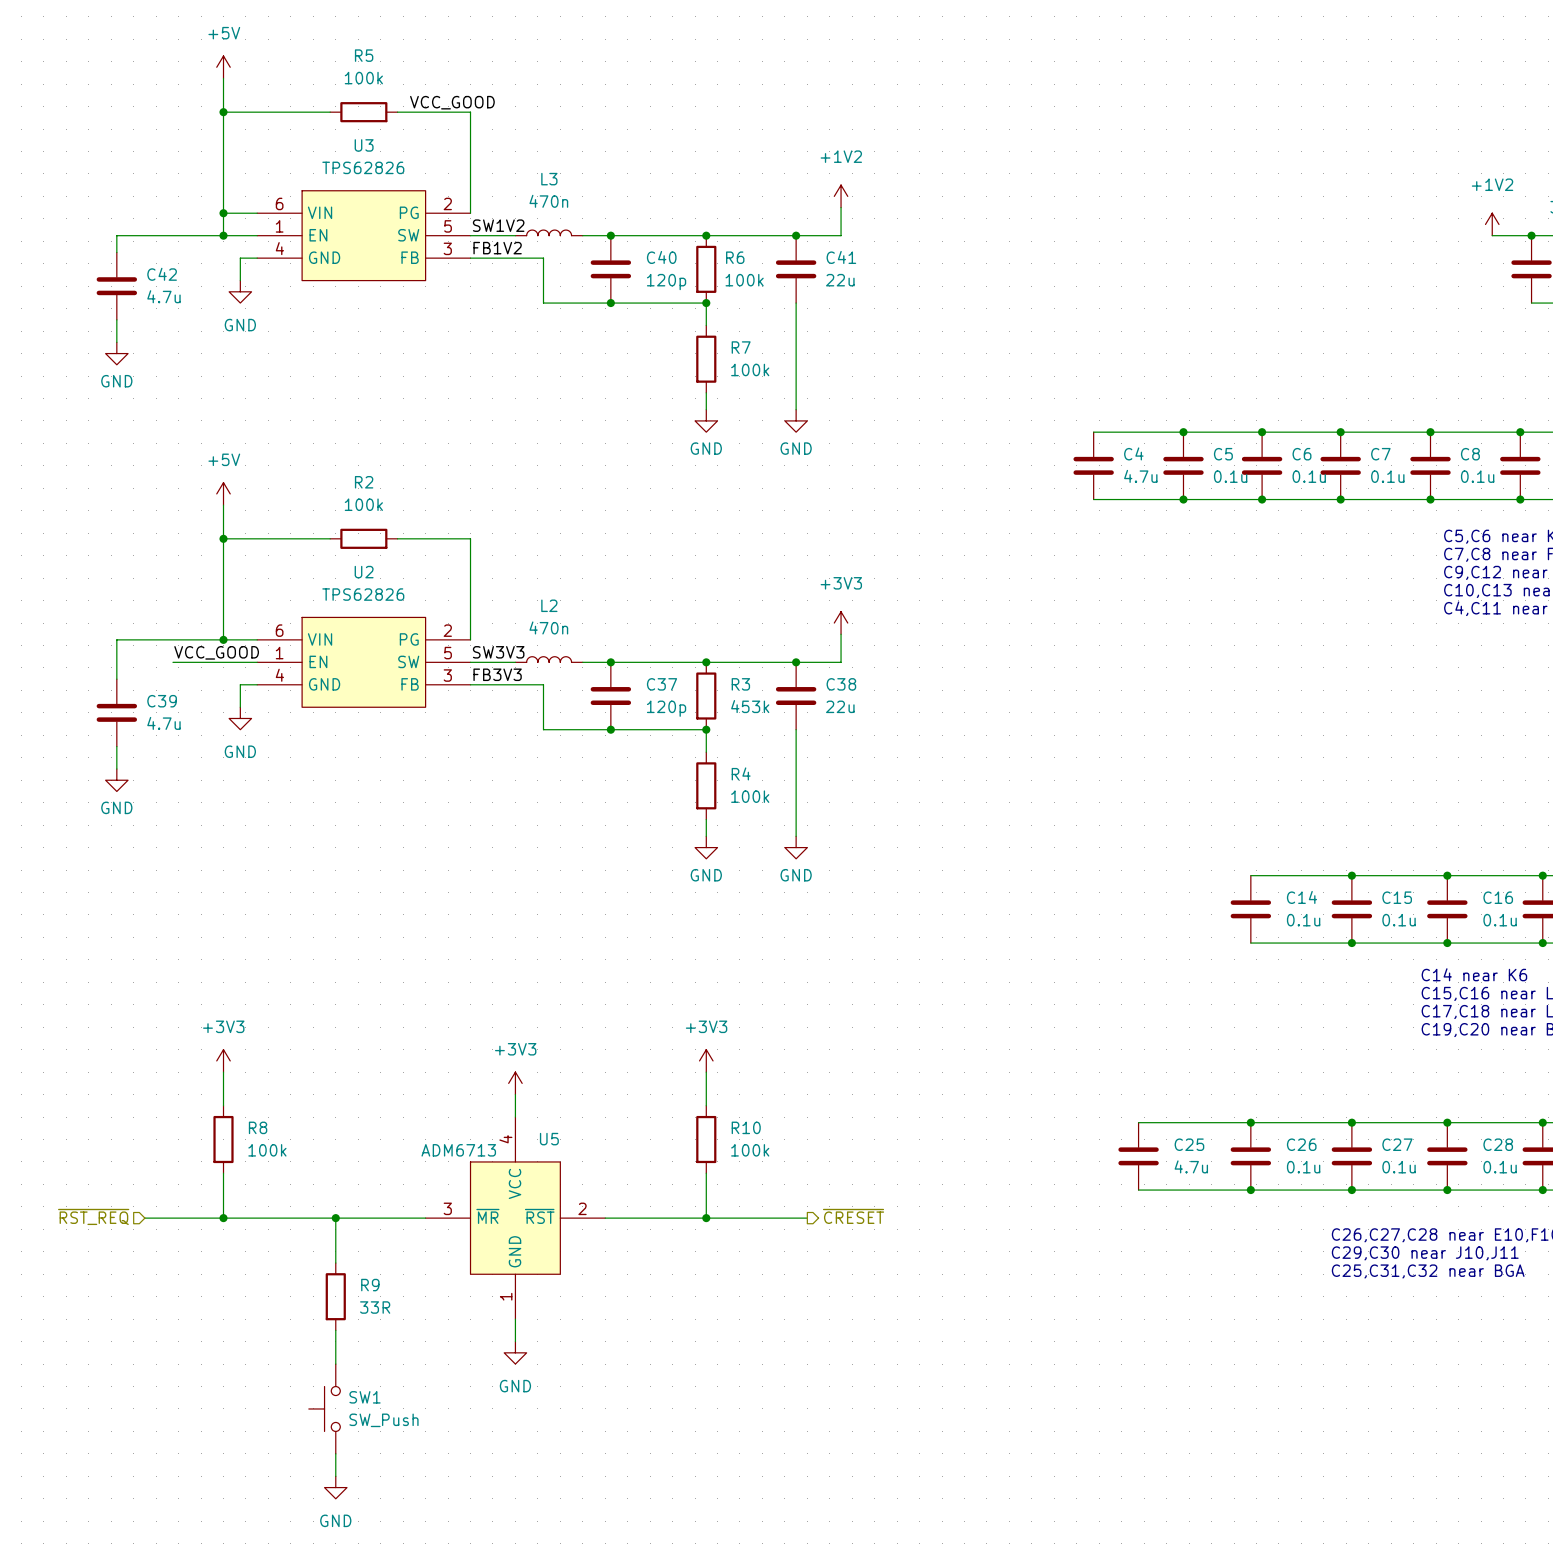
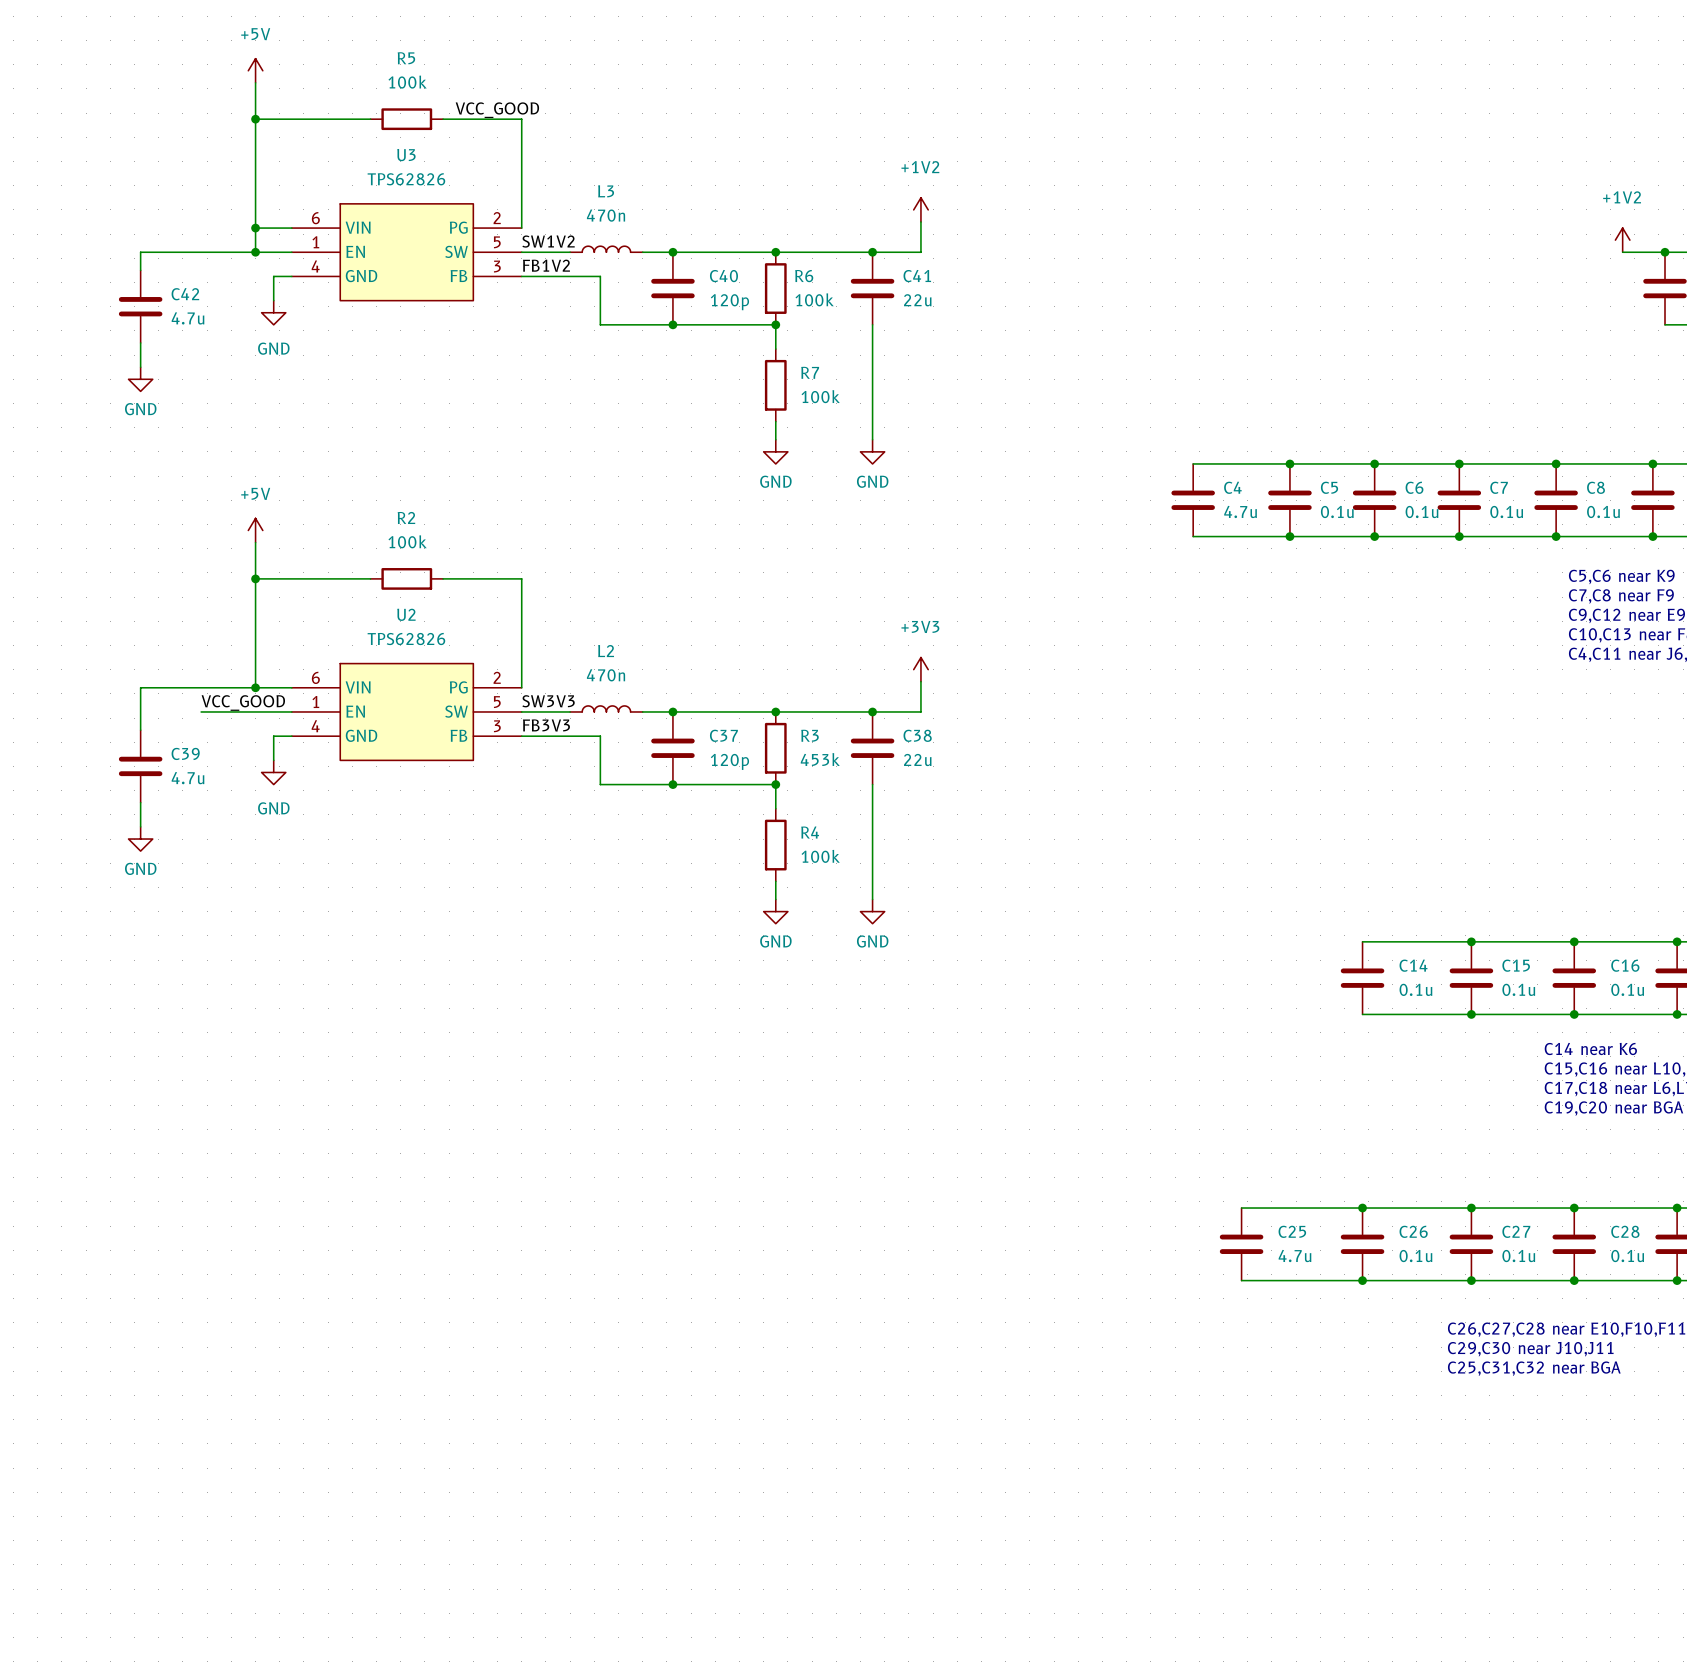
power symbol: +3V3 (223, 1060) -> none
power symbol: +3V3 (706, 1060) -> none
wire: (223, 1072) (223, 1105) -> none
wire: (706, 1072) (706, 1105) -> none
power symbol: +3V3 (515, 1083) -> none
wire: (515, 1094) (515, 1117) -> none
R8: 100k (223, 1139) -> none
R10: 100k (706, 1139) -> none
wire: (223, 1173) (223, 1218) -> none
wire: (706, 1173) (706, 1218) -> none
hierarchical label: ~{RST_REQ} (93, 1216) -> none
hierarchical label: ~{CRESET} (853, 1216) -> none
wire: (144, 1218) (425, 1218) -> none
junction: (223, 1218) -> none
wire: (335, 1218) (335, 1263) -> none
junction: (335, 1218) -> none
U5: ADM6713 (515, 1218) -> none
wire: (605, 1218) (807, 1218) -> none
junction: (706, 1218) -> none
R9: 33R (335, 1296) -> none
wire: (515, 1319) (515, 1341) -> none
wire: (335, 1330) (335, 1364) -> none
power symbol: GND (515, 1352) -> none
SW1: SW_Push (324, 1408) -> none
wire: (335, 1453) (335, 1476) -> none
power symbol: GND (335, 1487) -> none

